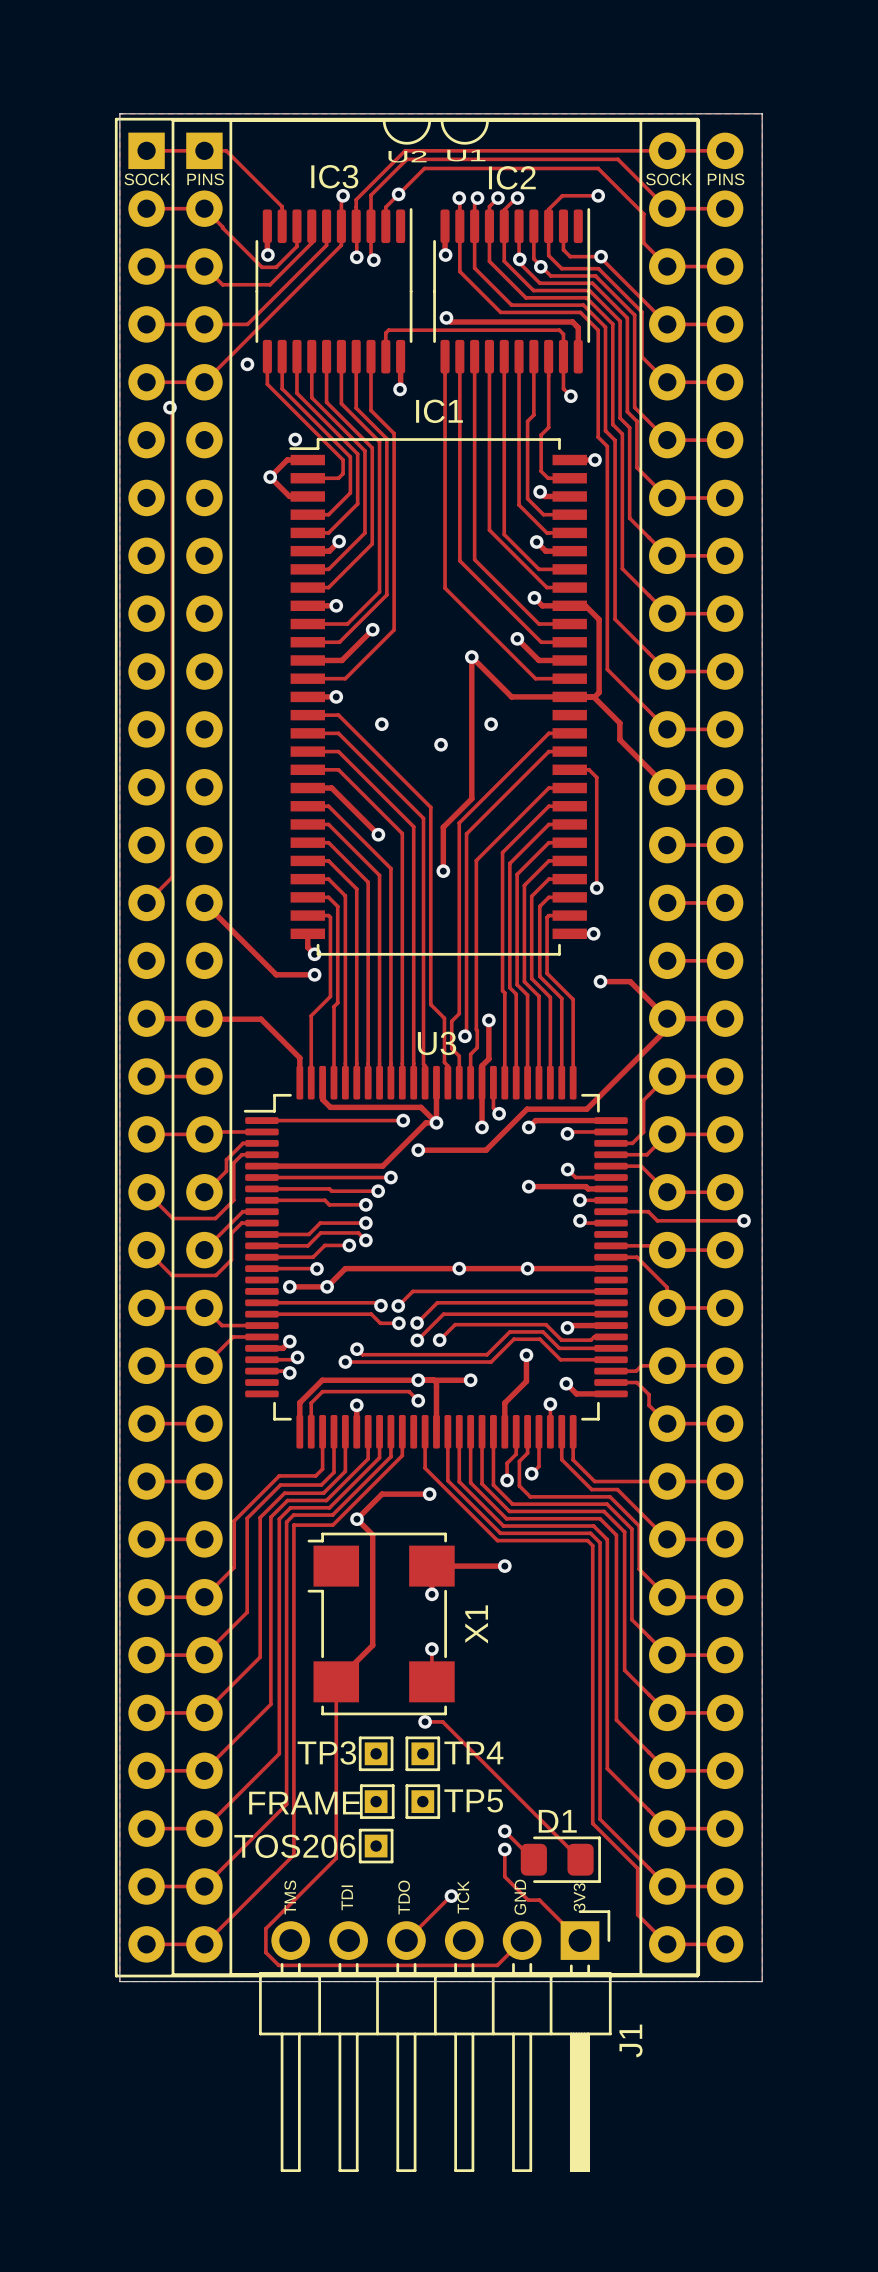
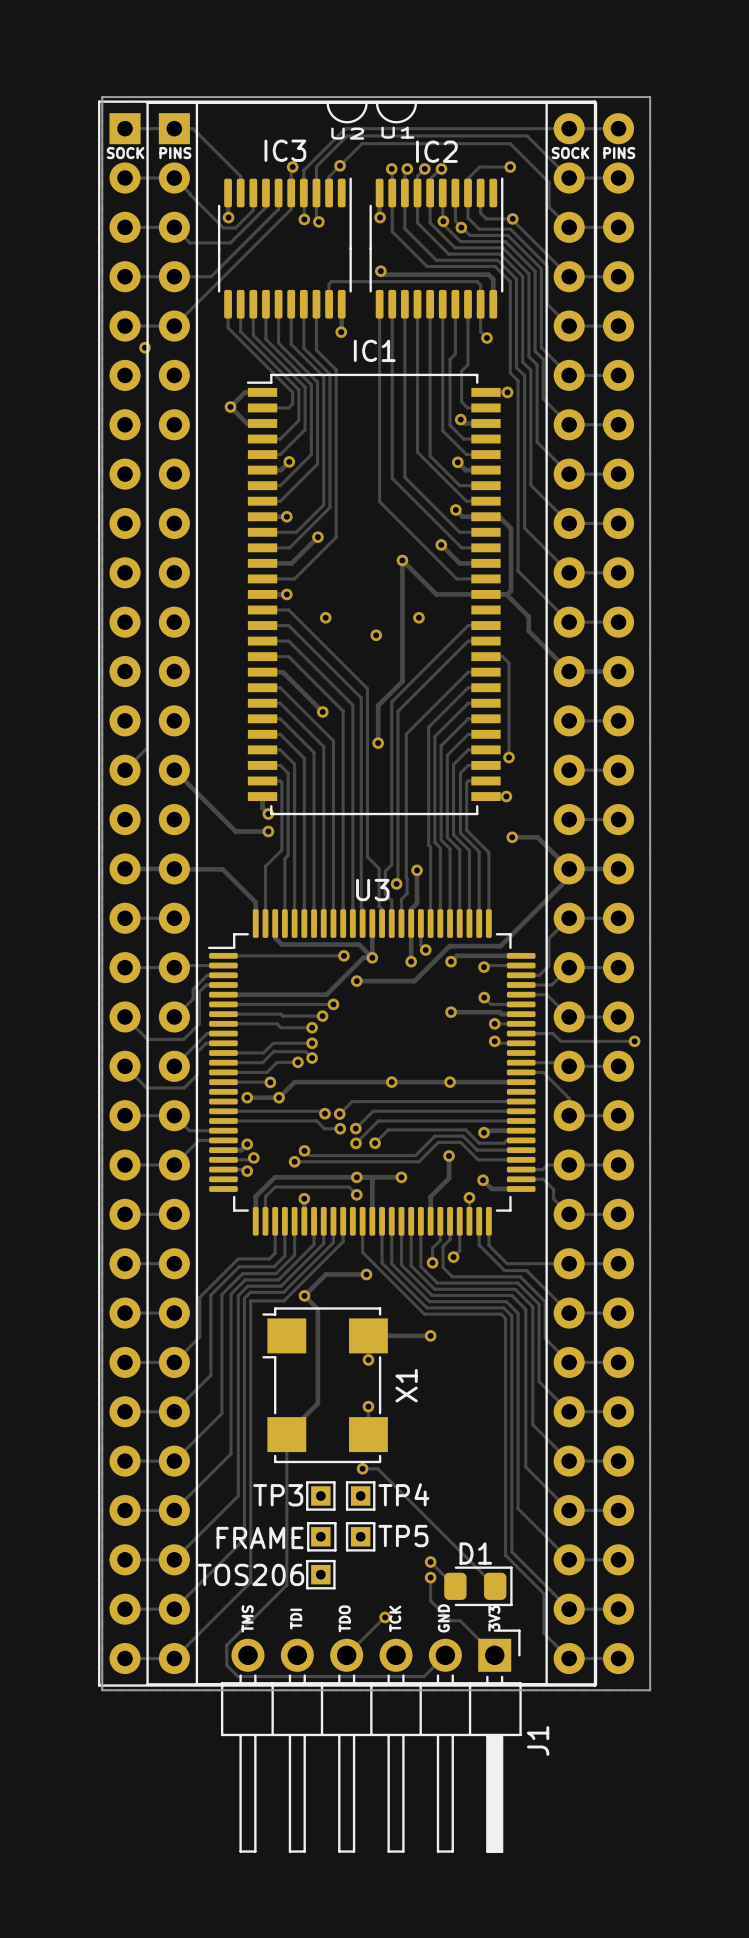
via: (247, 364) -> none
via: (295, 439) -> none

